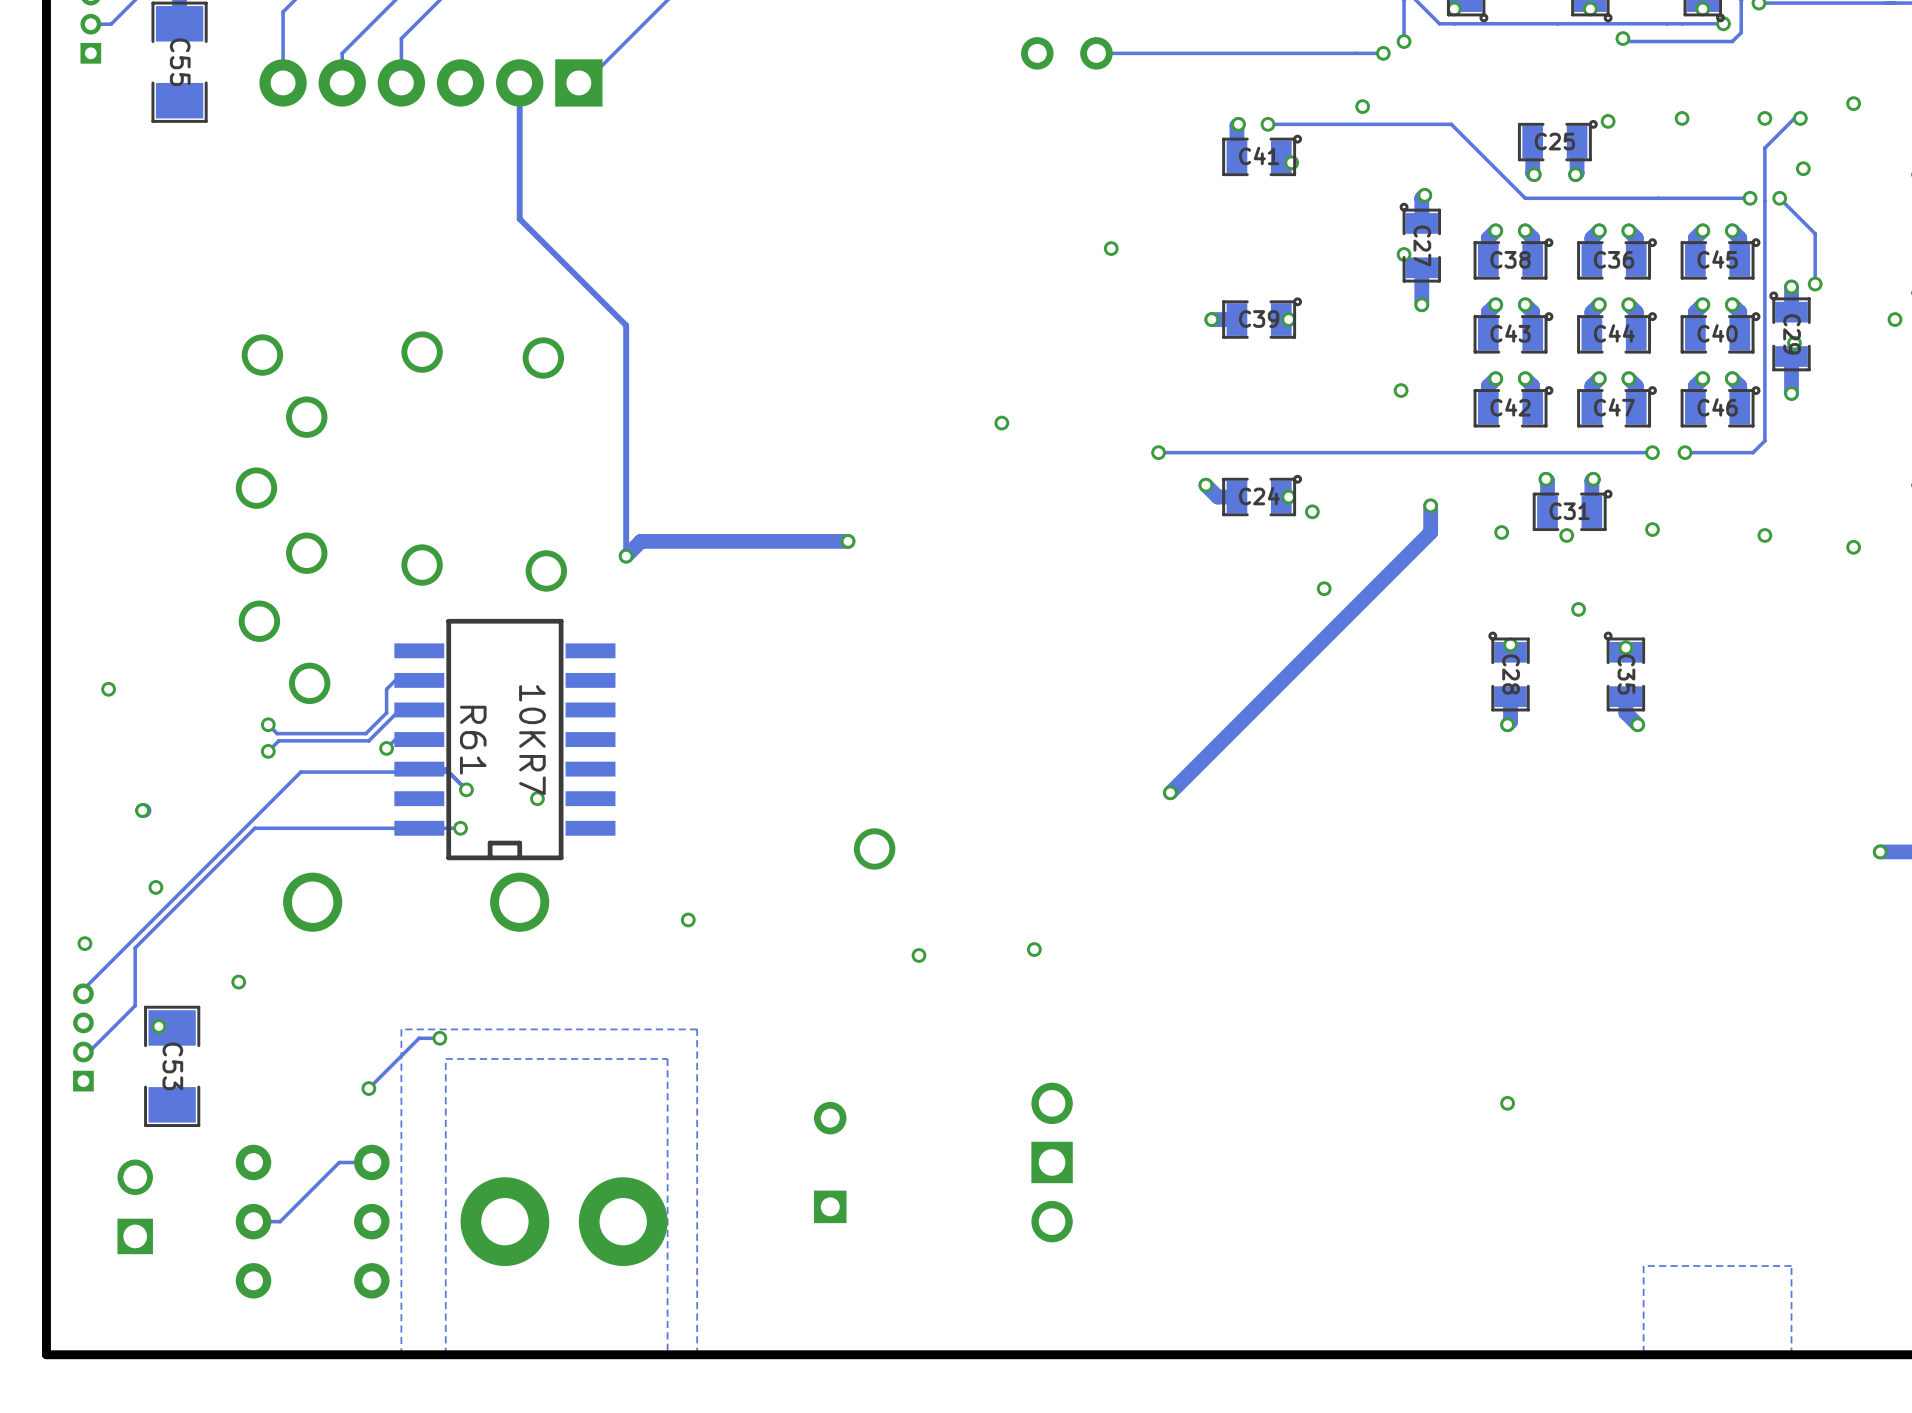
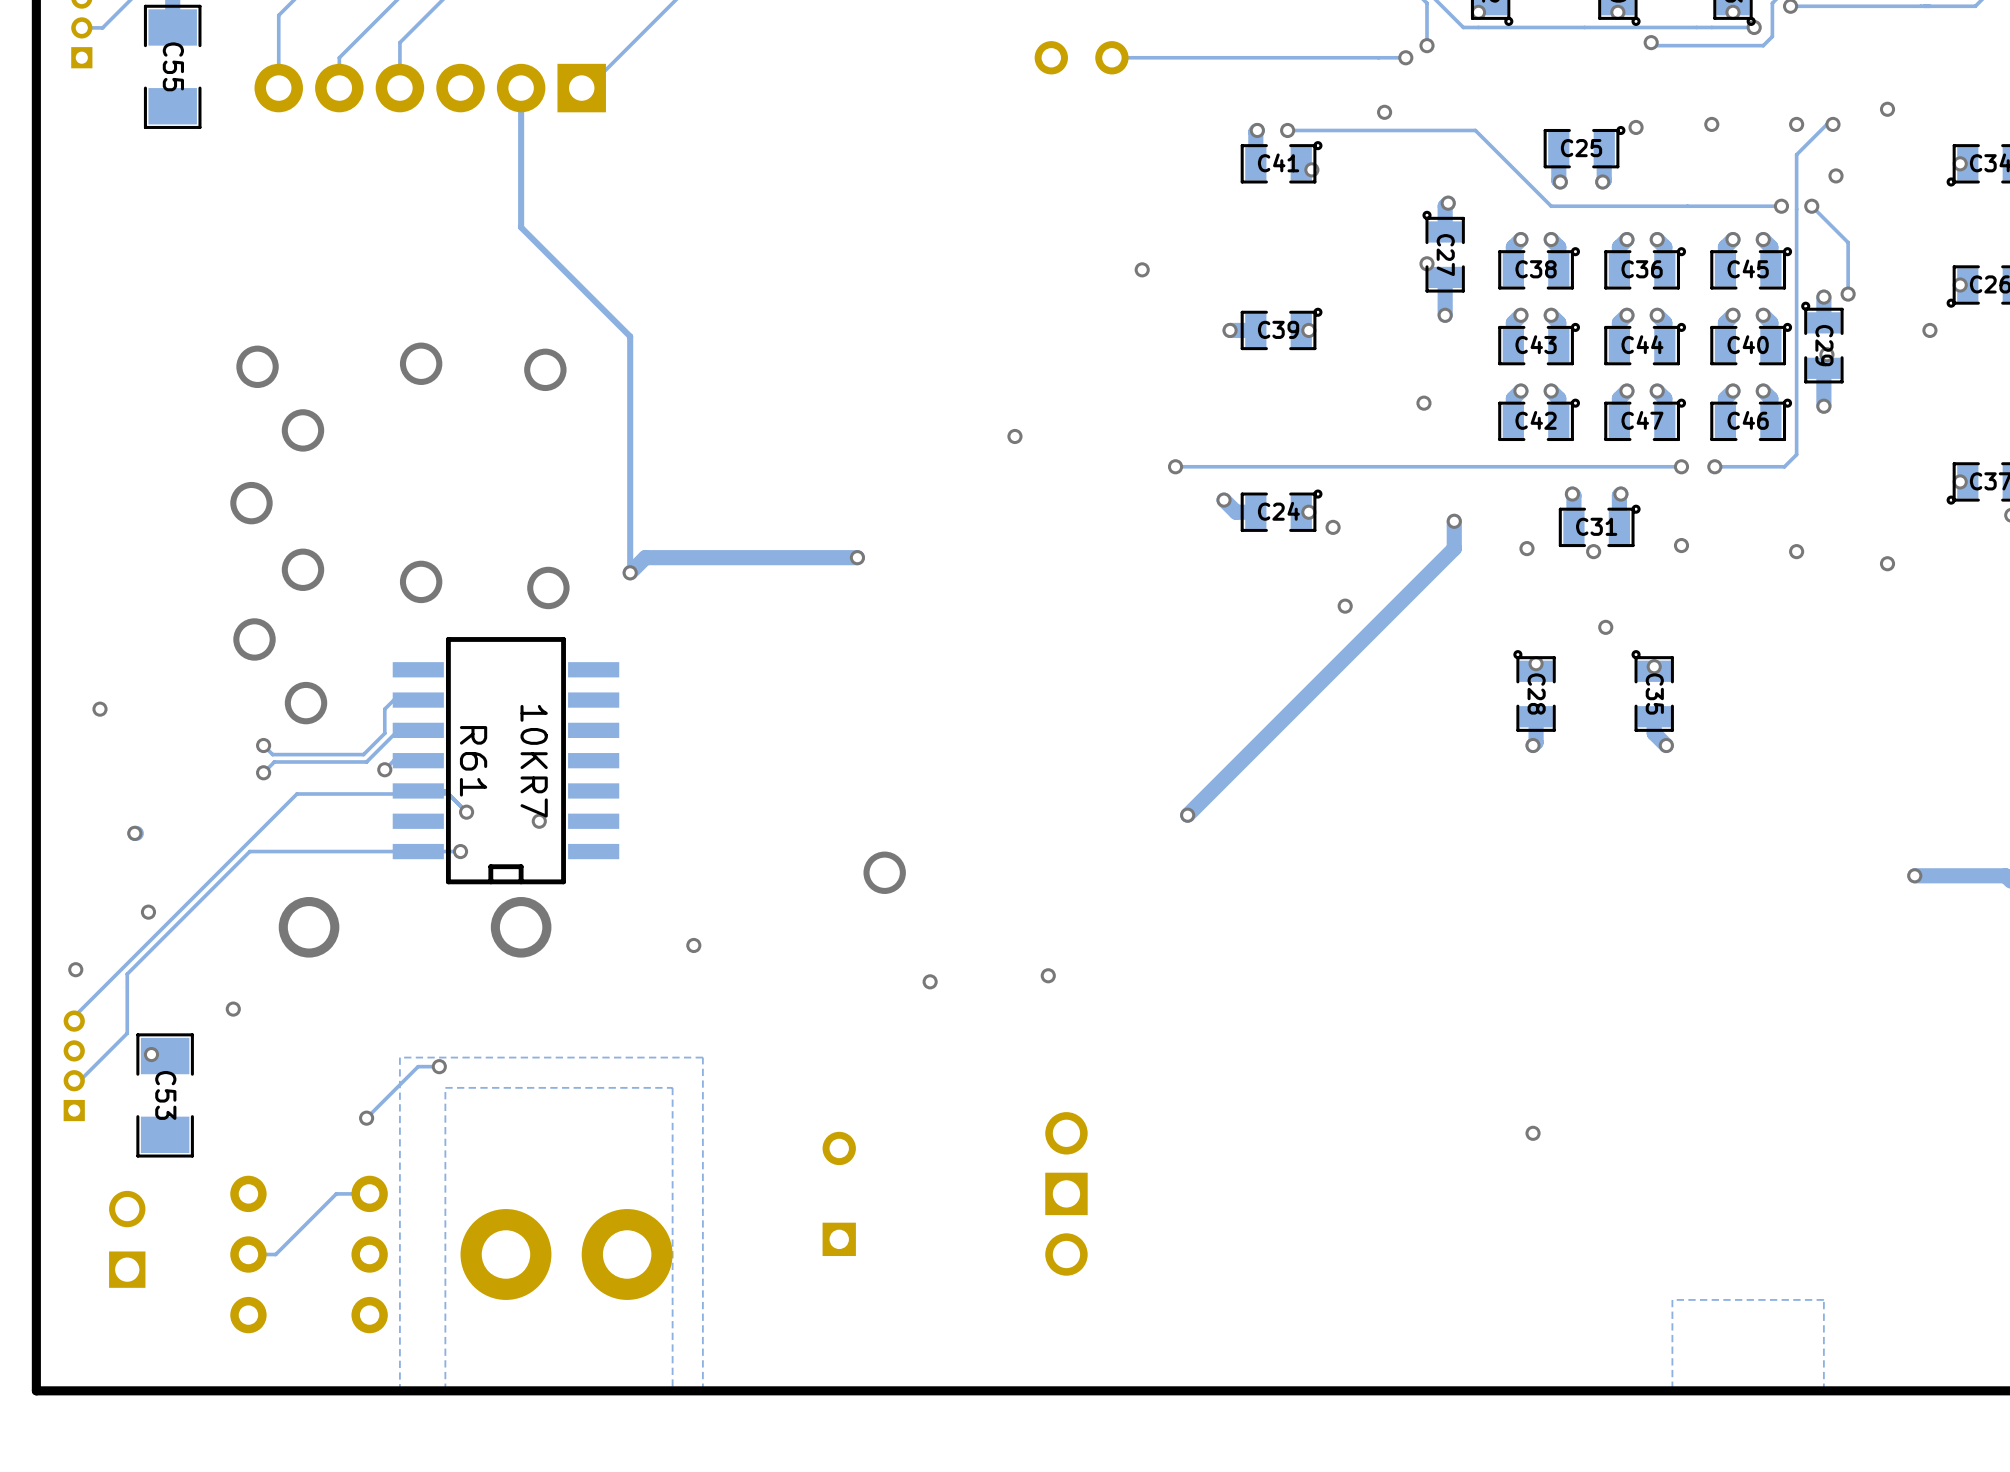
via position: (1111, 248) -> (1142, 269)

